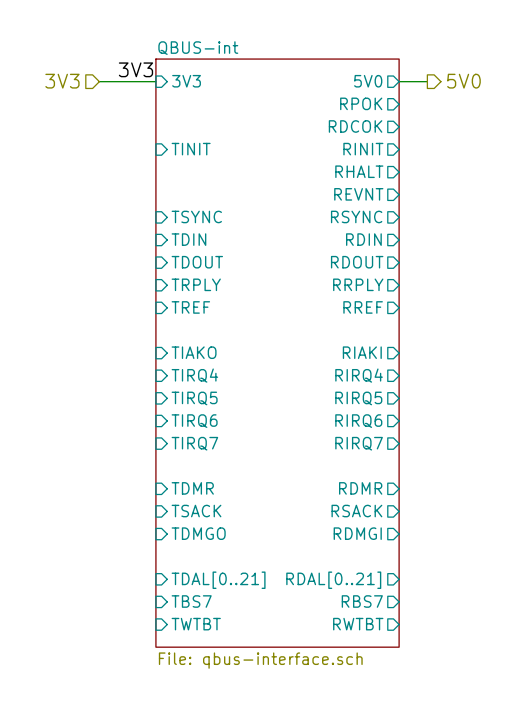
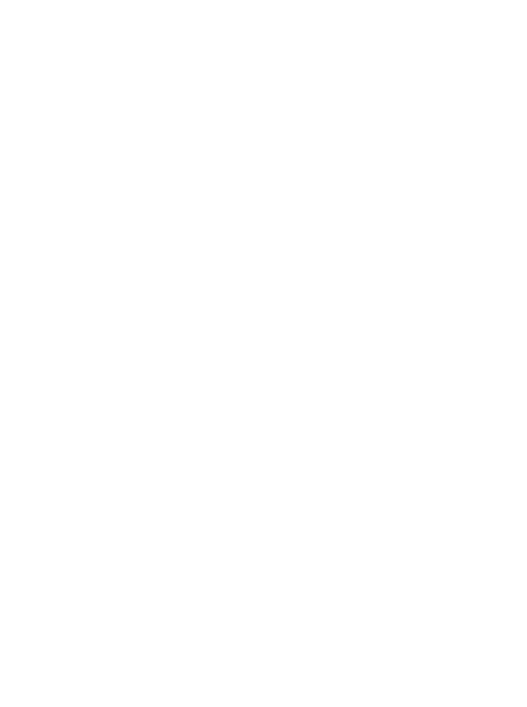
label: 3V3 (135, 69) -> none
hierarchical label: 3V3 (62, 81) -> none
wire: (99, 81) (155, 81) -> none
sheet pin: 3V3 (186, 81) -> none
sheet pin: 5V0 (368, 81) -> none
wire: (399, 81) (427, 81) -> none
hierarchical label: 5V0 (463, 81) -> none
sheet pin: RPOK (361, 103) -> none
sheet pin: RDCOK (355, 126) -> none
sheet pin: TINIT (191, 149) -> none
sheet pin: RINIT (363, 149) -> none
sheet pin: RHALT (359, 171) -> none
sheet pin: REVNT (358, 194) -> none
sheet pin: TSYNC (196, 216) -> none
sheet pin: RSYNC (356, 216) -> none
sheet pin: TDIN (188, 239) -> none
sheet pin: RDIN (363, 239) -> none
sheet pin: TDOUT (197, 262) -> none
sheet pin: RDOUT (357, 262) -> none
sheet pin: TRPLY (196, 284) -> none
sheet pin: RRPLY (358, 284) -> none
sheet pin: TREF (190, 307) -> none
sheet pin: RREF (363, 307) -> none
sheet pin: TIAKO (194, 352) -> none
sheet pin: RIAKI (362, 352) -> none
sheet QBUS-int: File: qbus-interface.sch (277, 353) -> none
sheet pin: TIRQ4 (194, 375) -> none
sheet pin: RIRQ4 (359, 375) -> none
sheet pin: TIRQ5 (194, 398) -> none
sheet pin: RIRQ5 (358, 398) -> none
sheet pin: TIRQ6 (194, 421) -> none
sheet pin: RIRQ6 (358, 421) -> none
sheet pin: TIRQ7 (194, 443) -> none
sheet pin: RIRQ7 (359, 443) -> none
sheet pin: TDMR (192, 488) -> none
sheet pin: RDMR (360, 488) -> none
sheet pin: TSACK (196, 511) -> none
sheet pin: RSACK (356, 511) -> none
sheet pin: TDMGO (198, 533) -> none
sheet pin: RDMGI (357, 533) -> none
sheet pin: TDAL[0..21] (218, 580) -> none
sheet pin: RDAL[0..21] (333, 580) -> none
sheet pin: TBS7 (191, 601) -> none
sheet pin: RBS7 (362, 601) -> none
sheet pin: TWTBT (196, 624) -> none
sheet pin: RWTBT (358, 624) -> none

